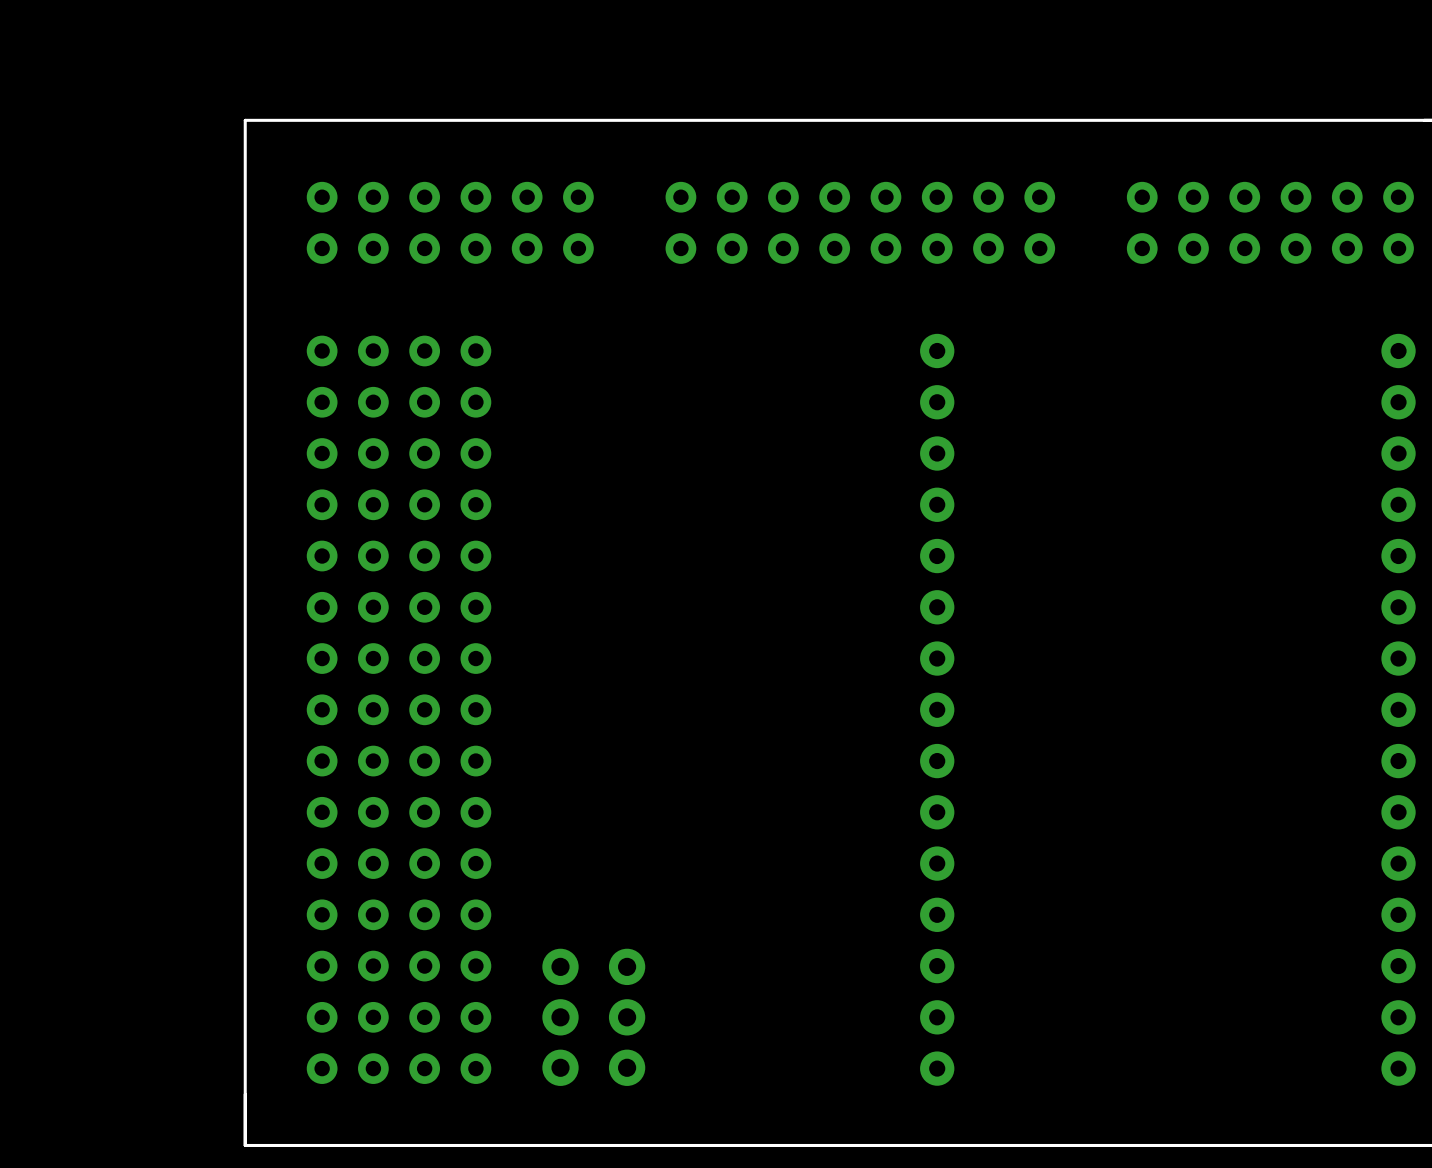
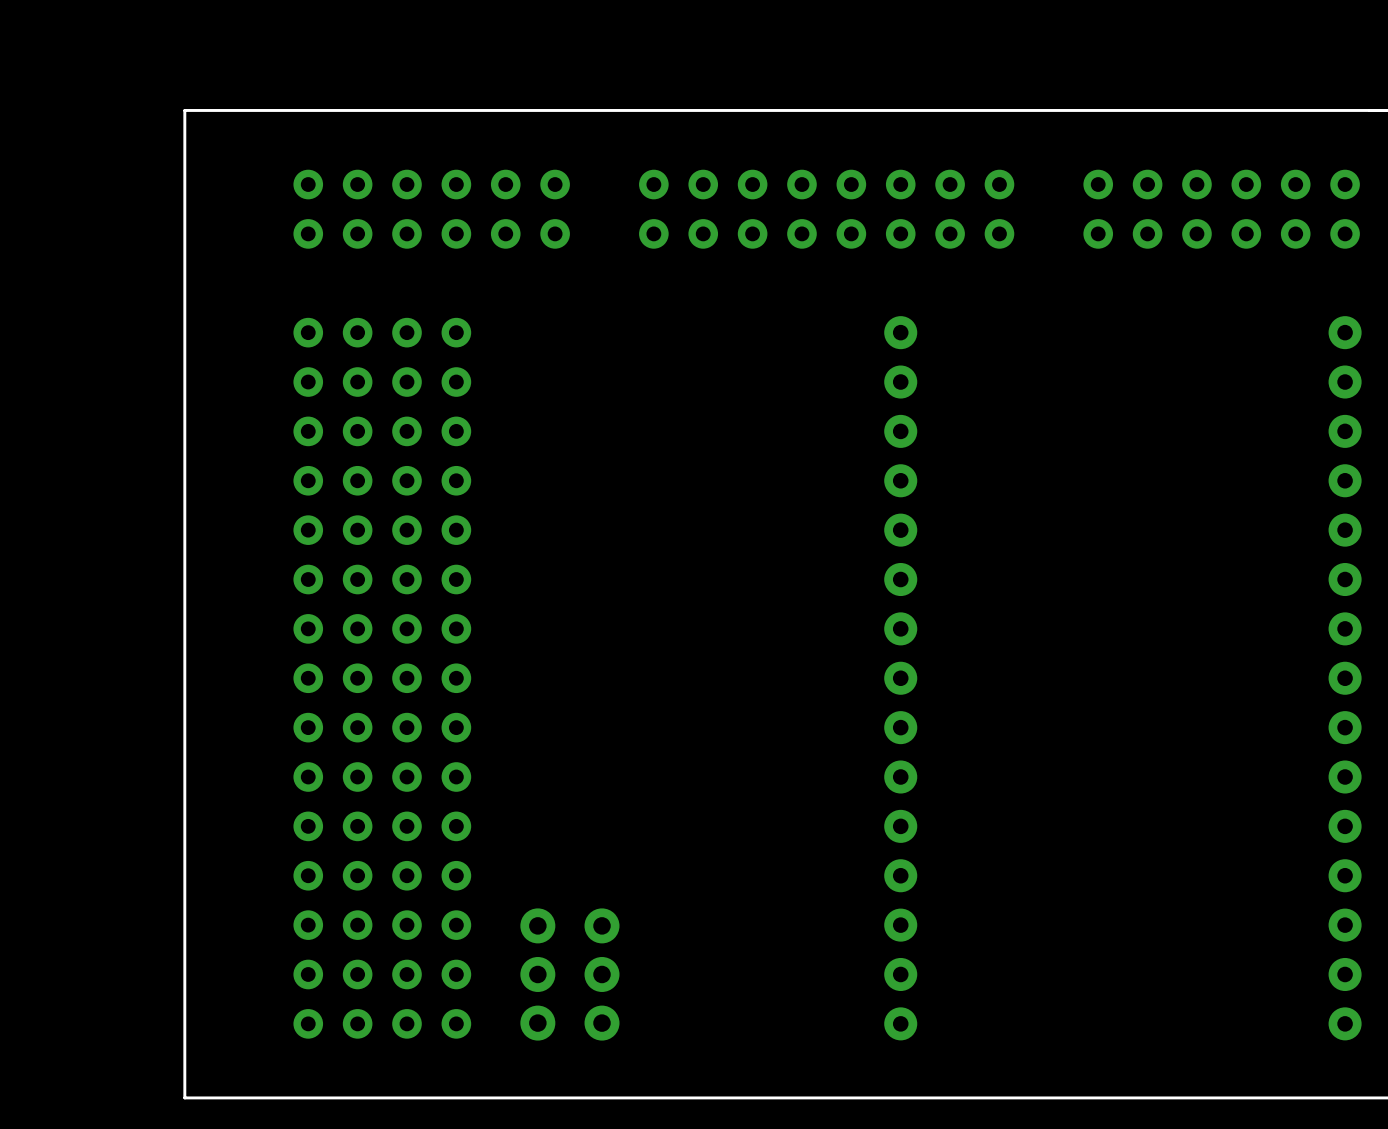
board edge: (245, 120) (245, 1145) -> (234, 110) (184, 110) (184, 1097) (234, 1097)

